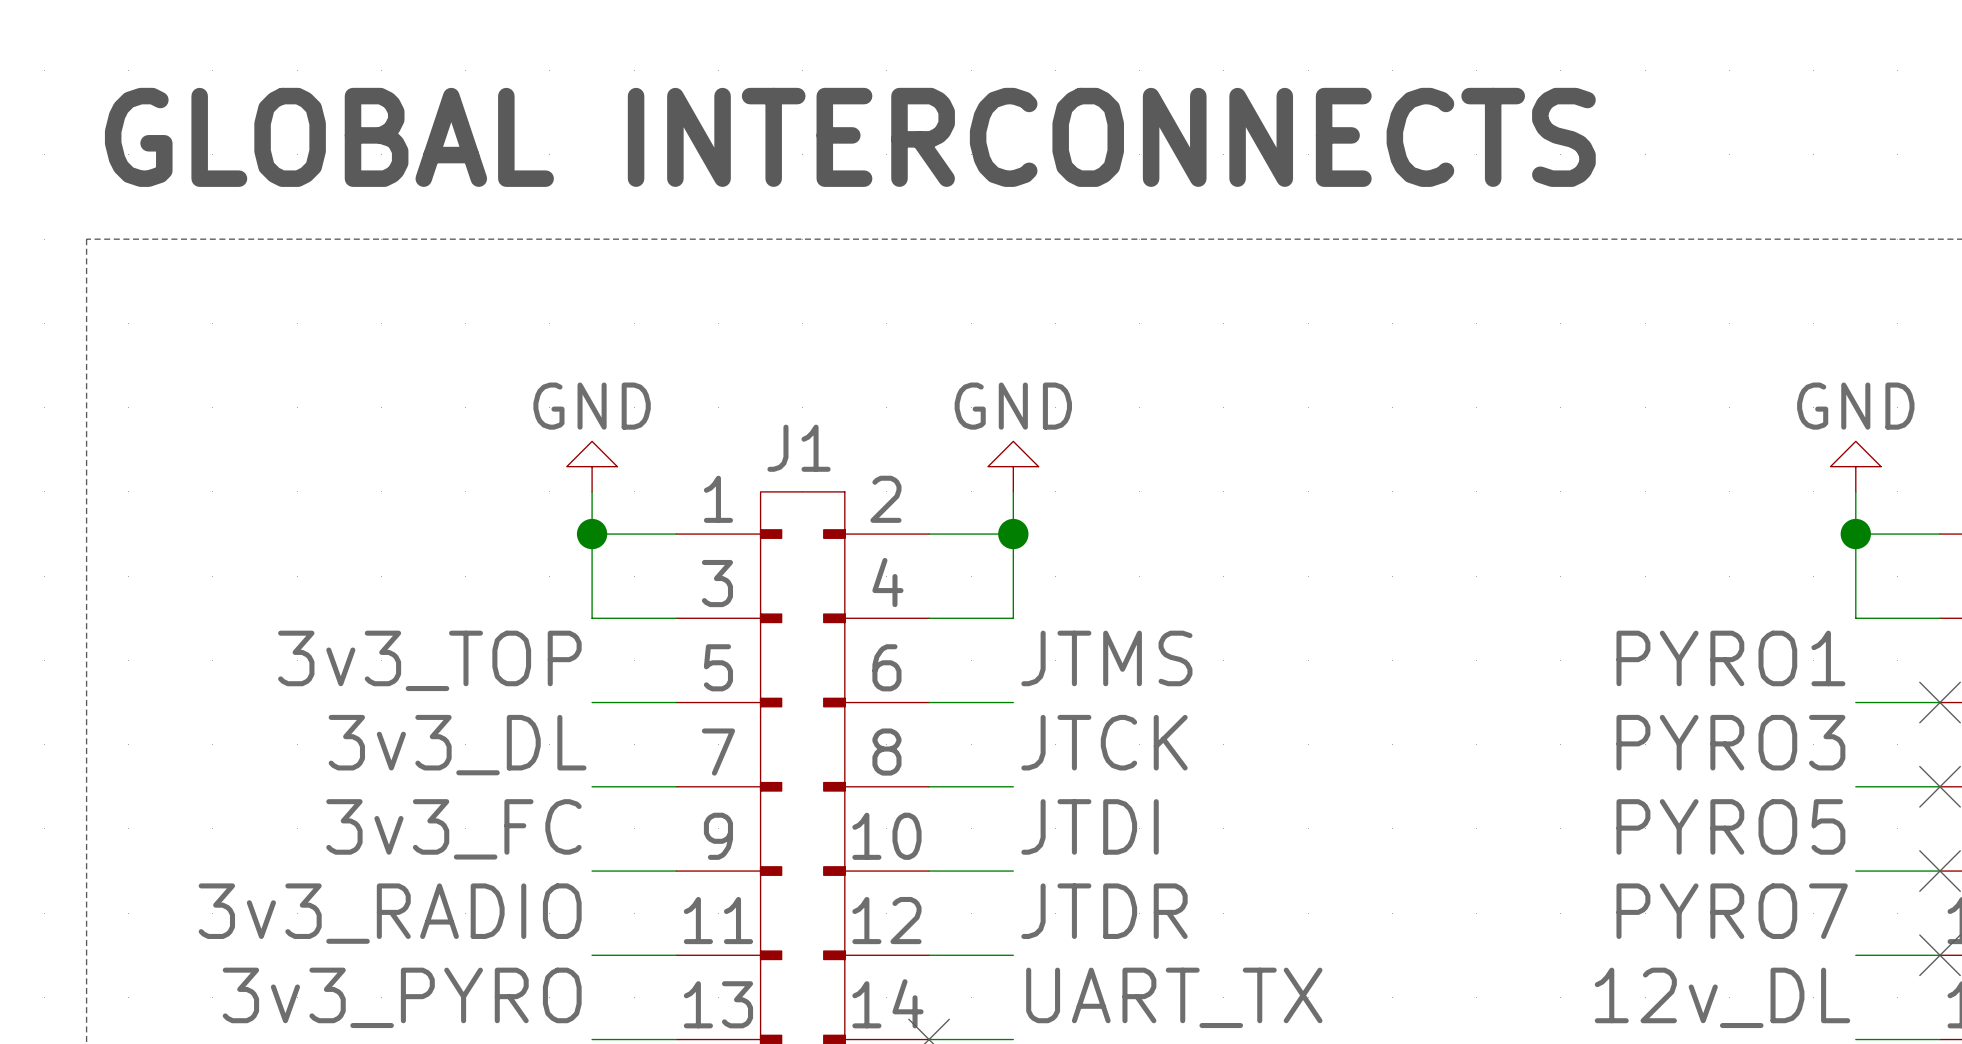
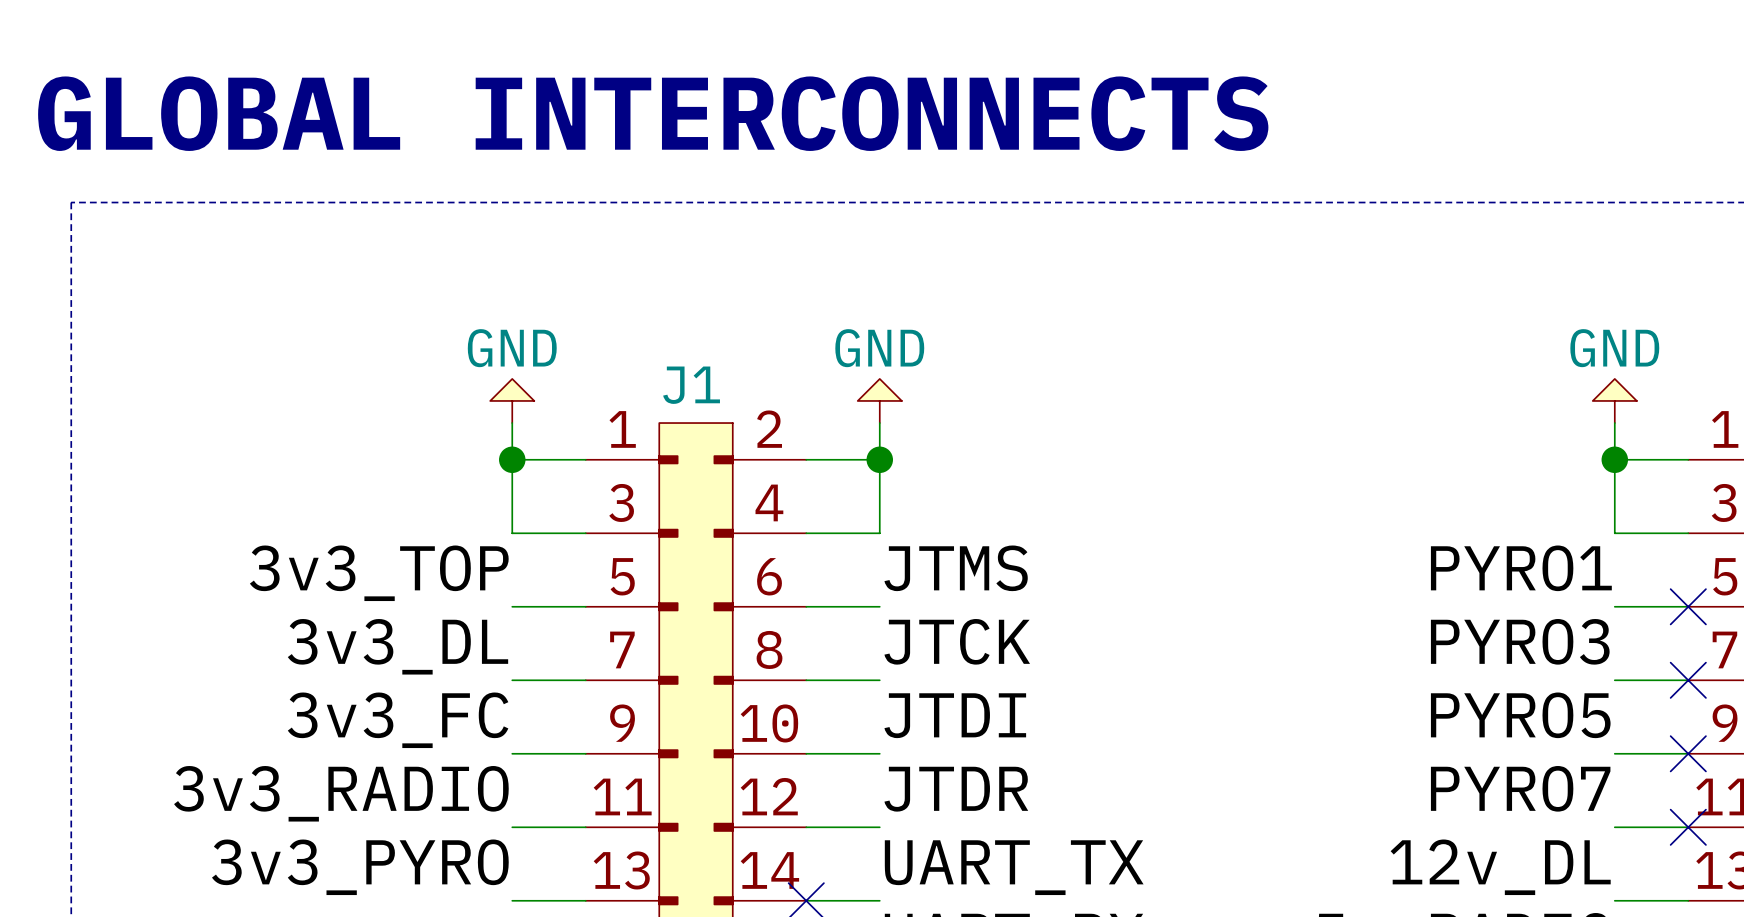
text position: GLOBAL INTERCONNECTS (850, 137) -> GLOBAL INTERCONNECTS (653, 113)

